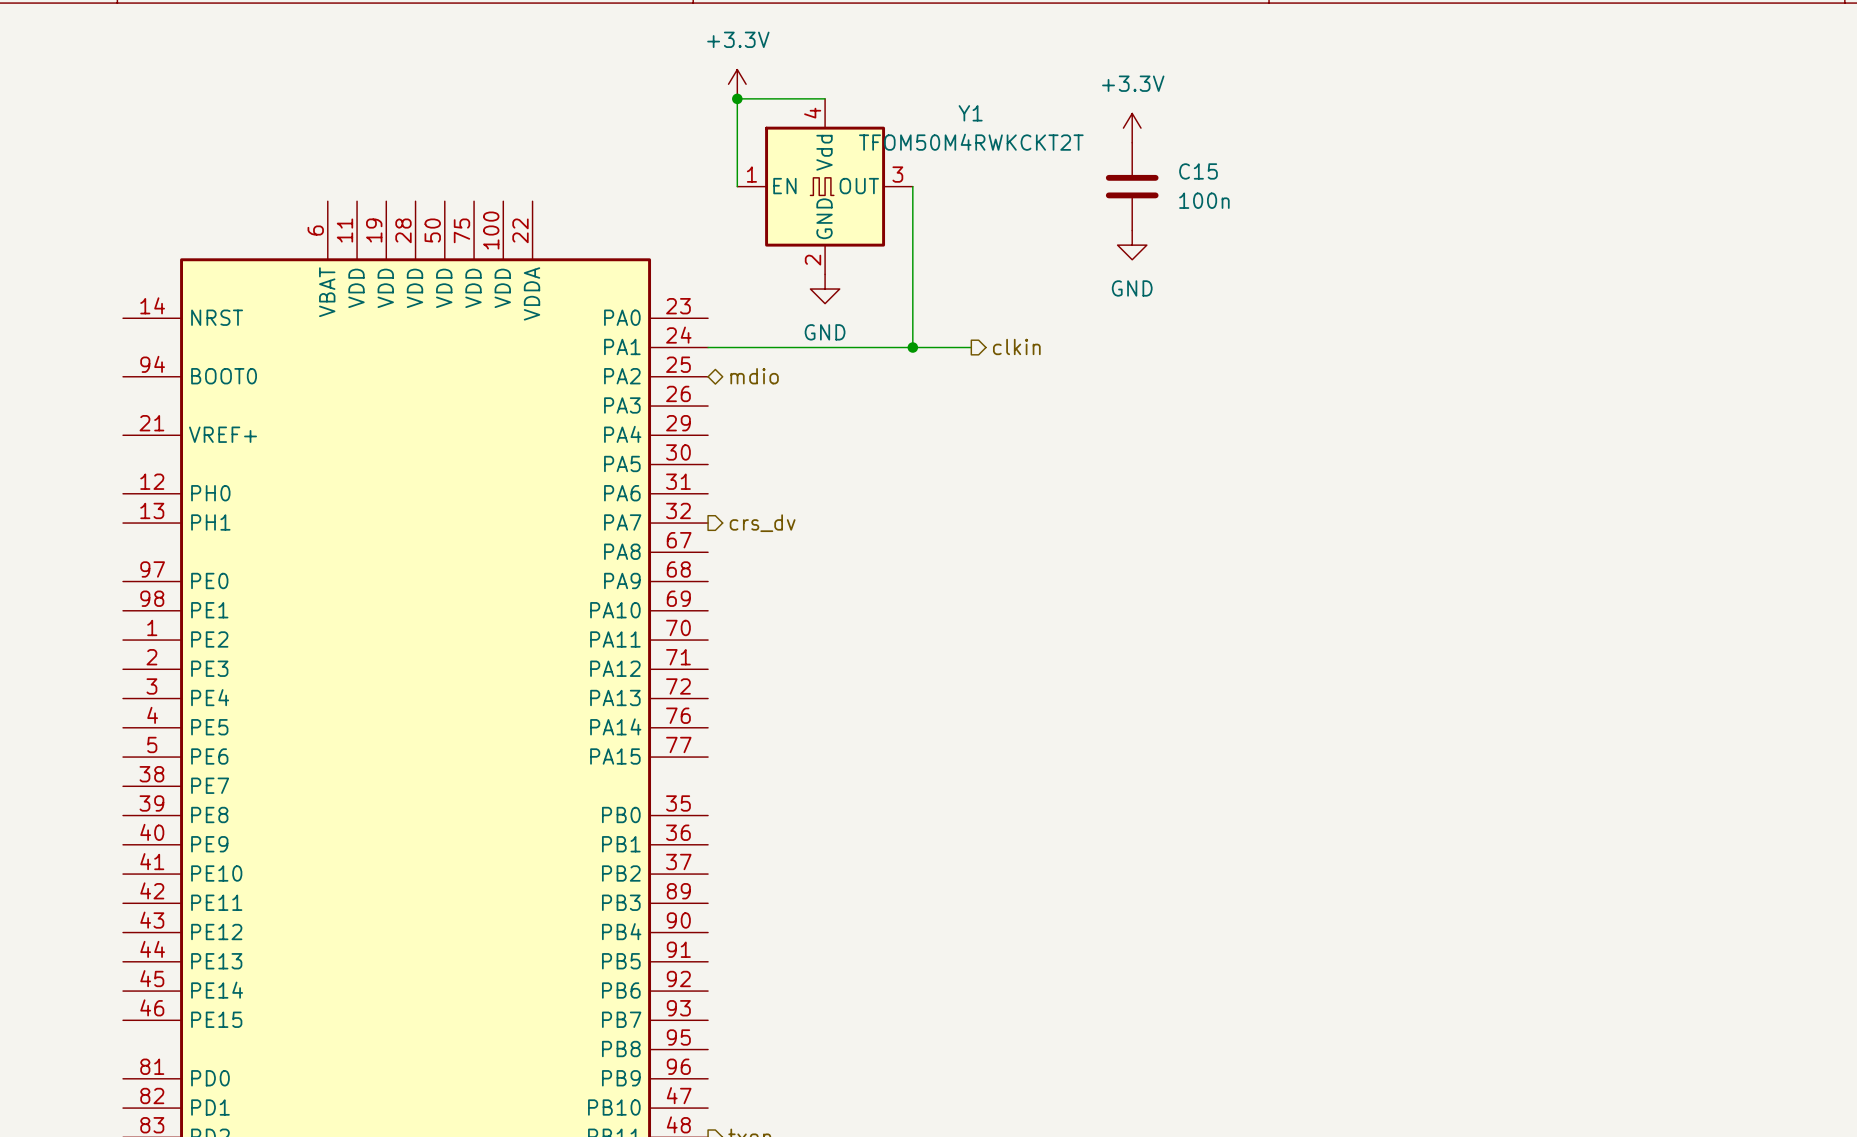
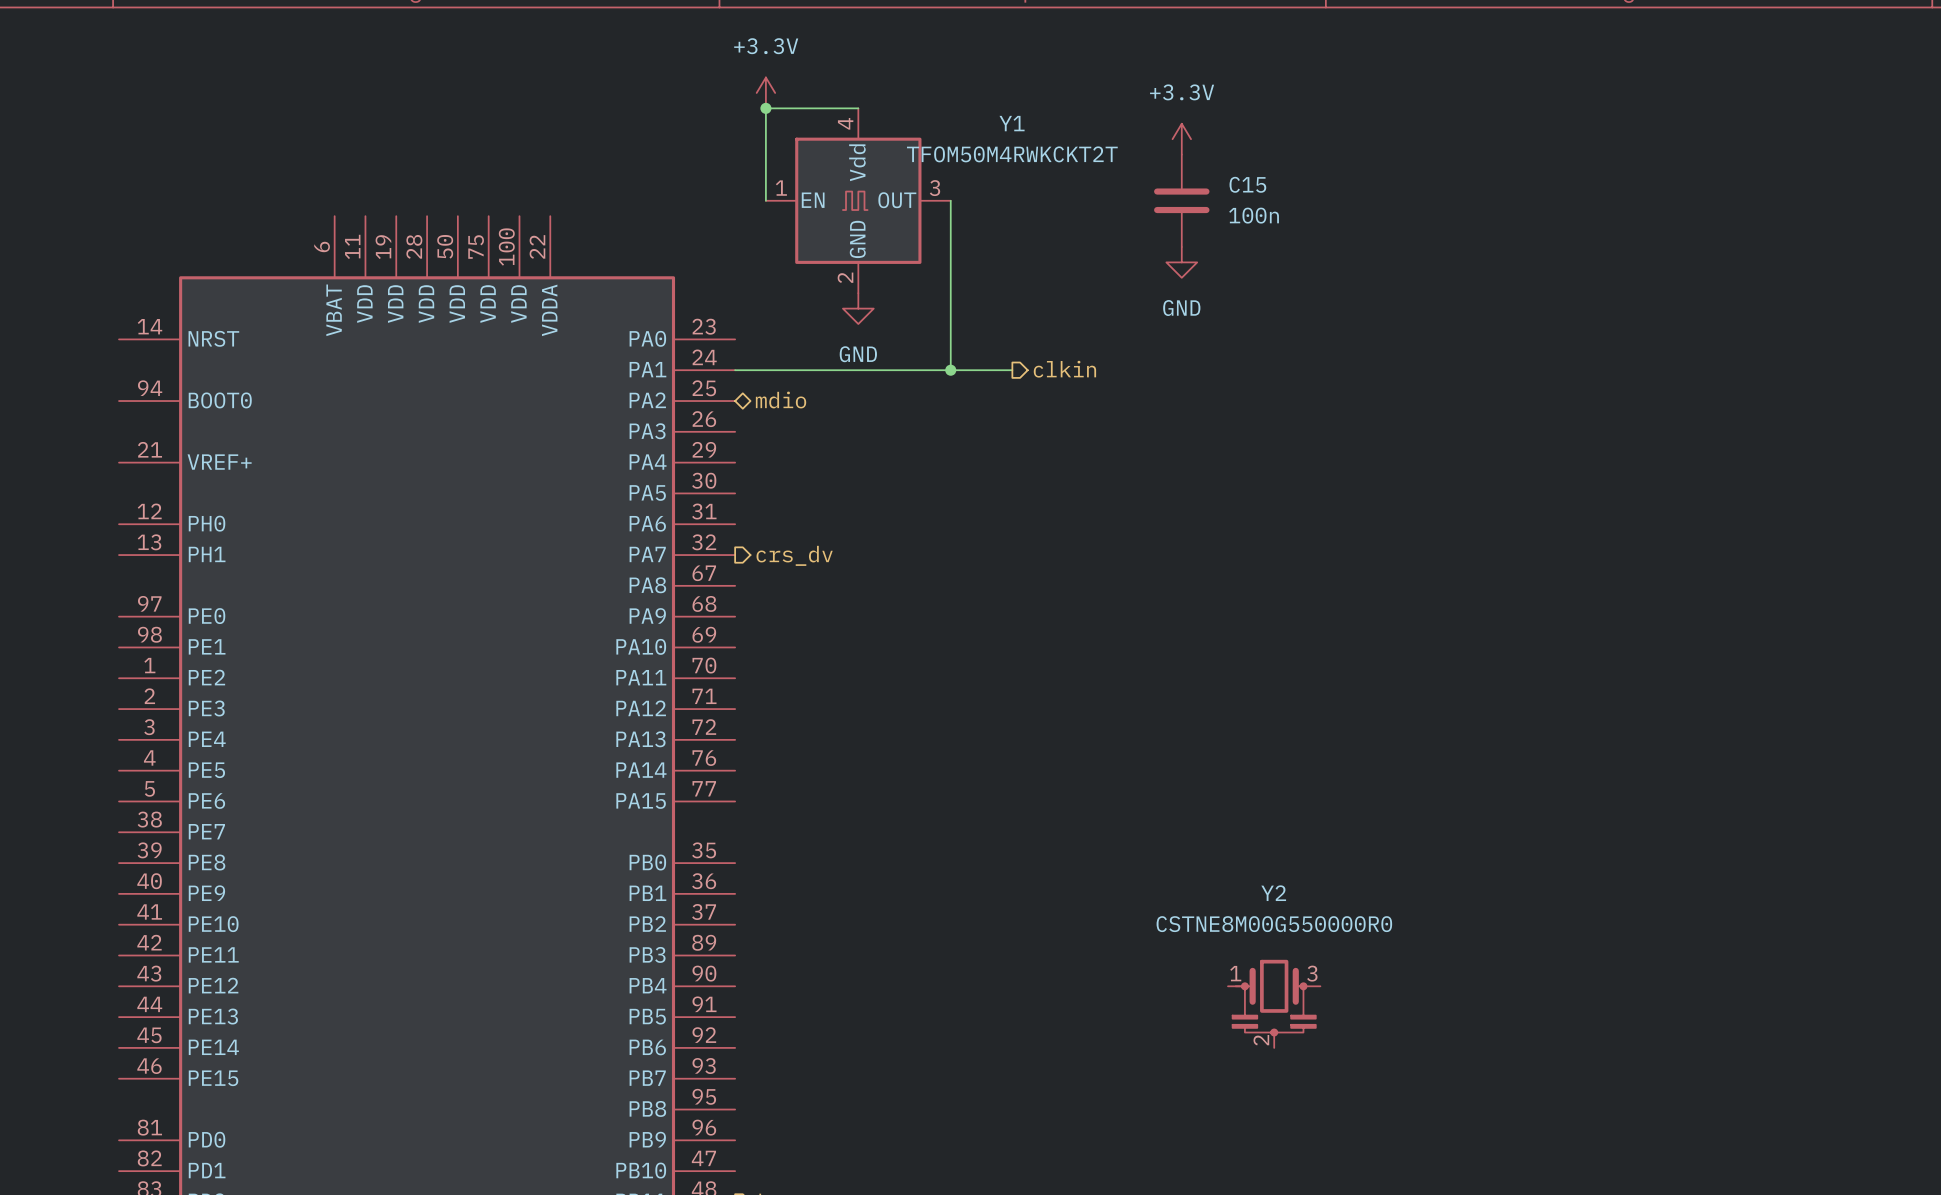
Y2: none -> CSTNE8M00G550000R0 (1274, 1003)

